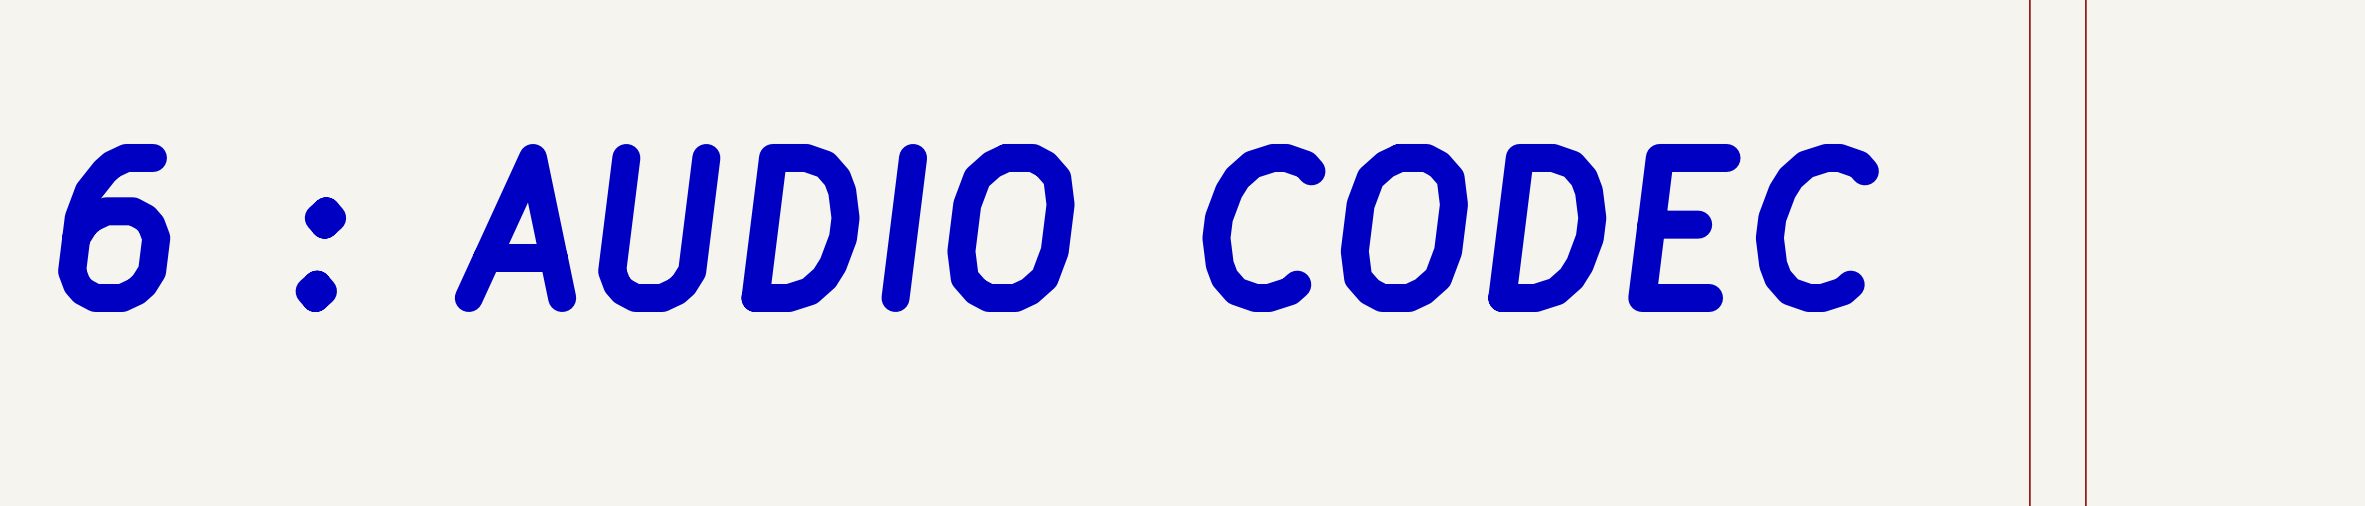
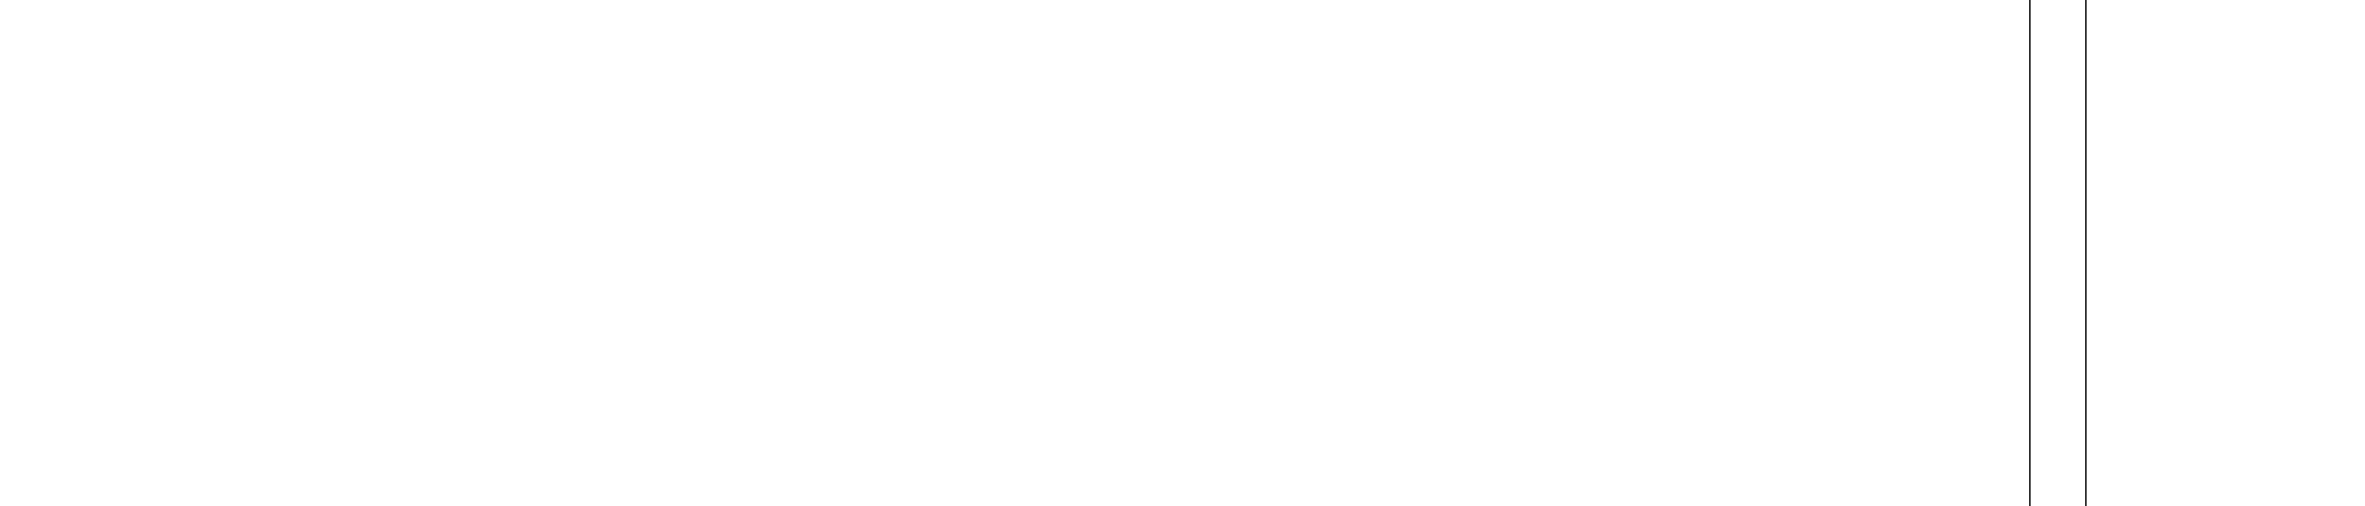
text: 6 : AUDIO CODEC (968, 227) -> none

